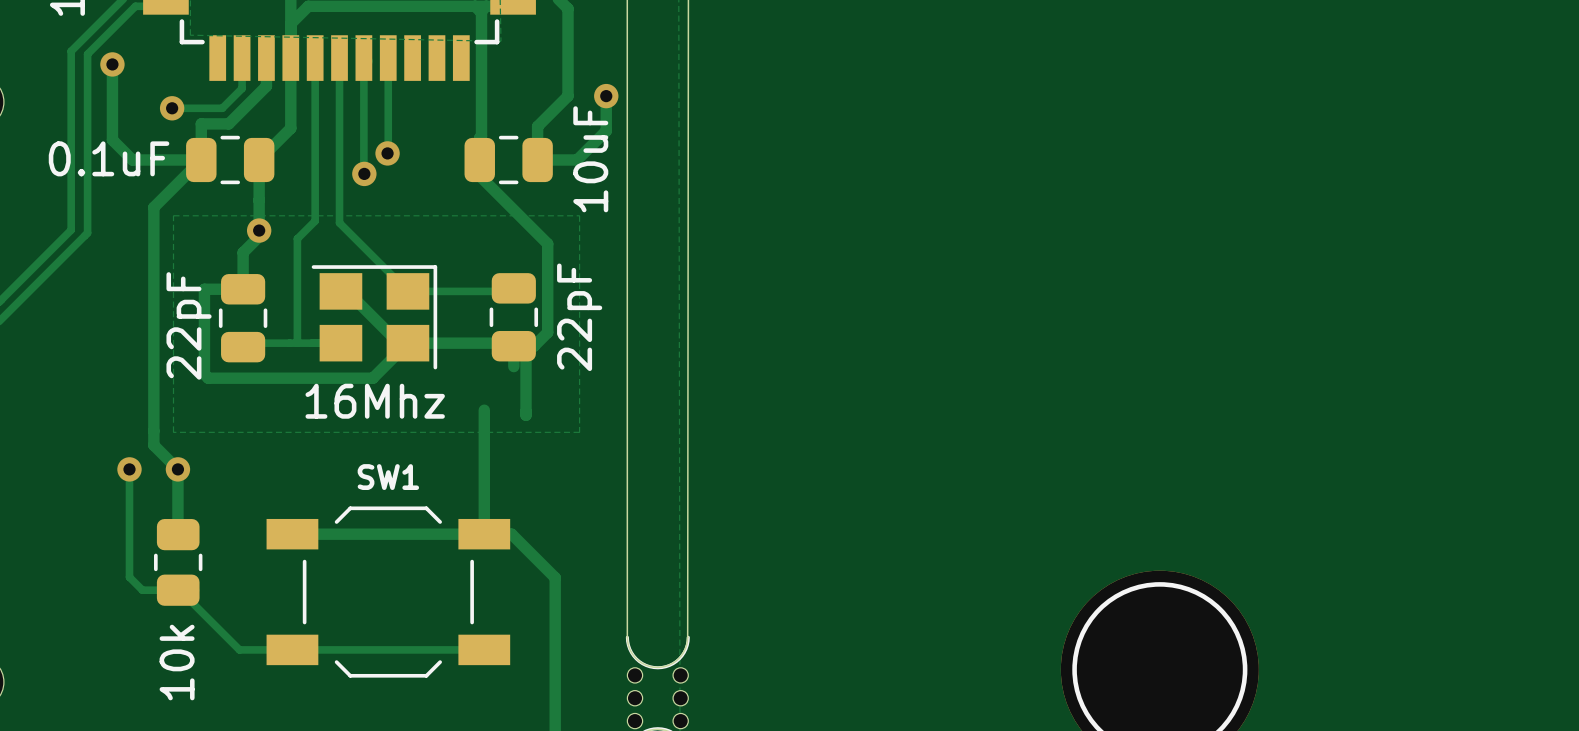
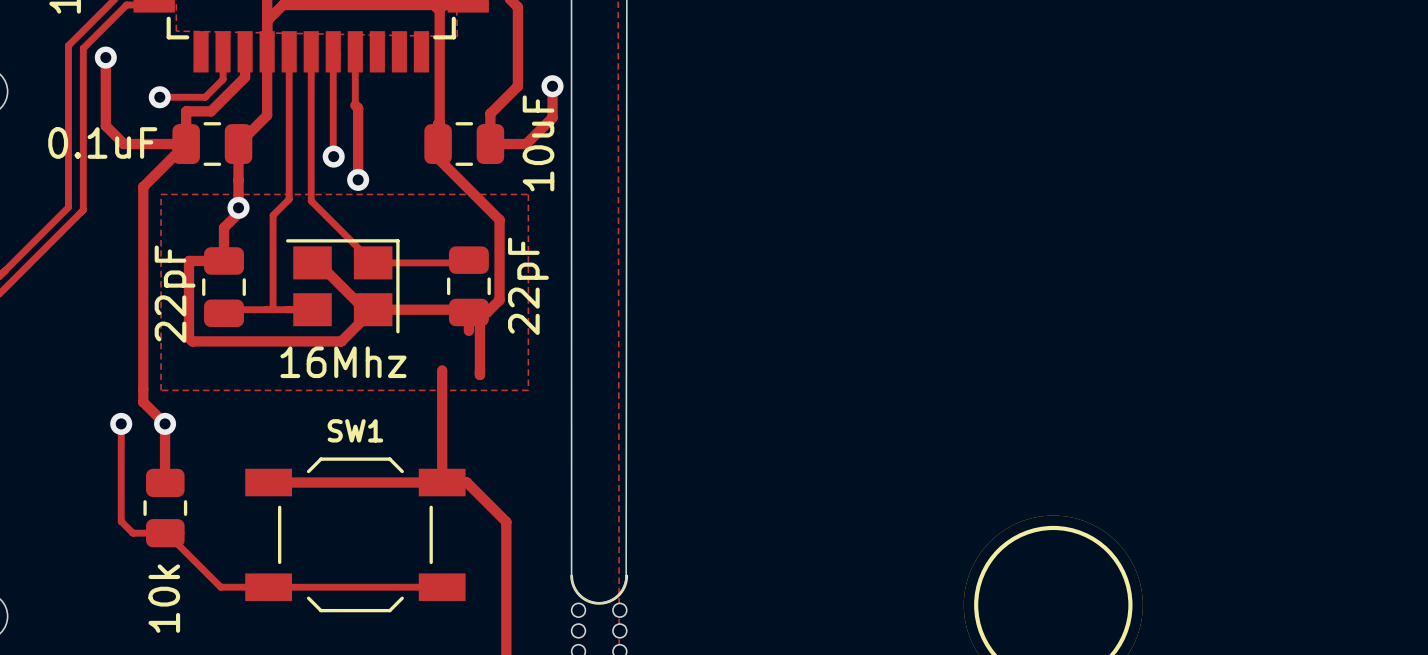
track: (388, 117) (387, 153) -> (355, 105) (358, 108) (358, 179)
via position: (387, 153) -> (358, 179)

